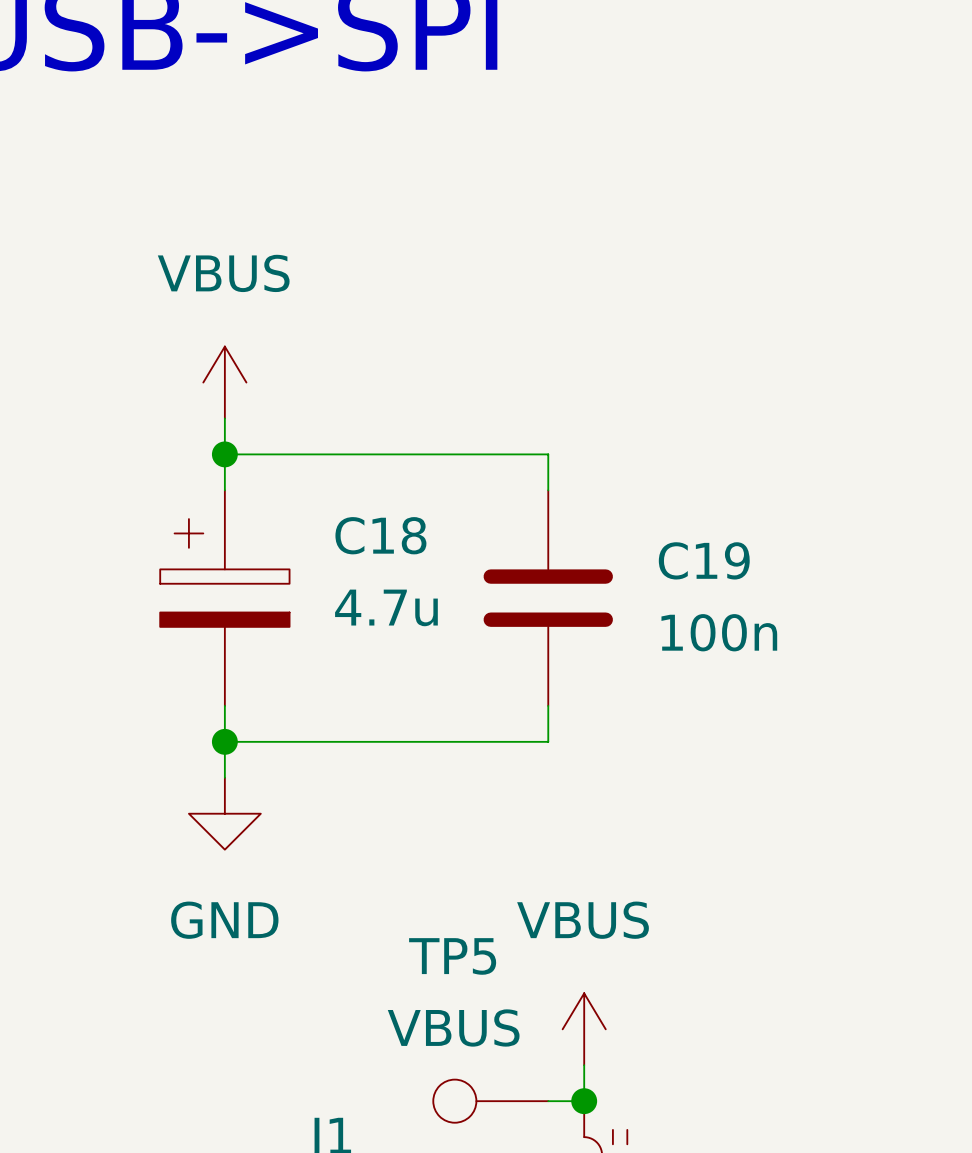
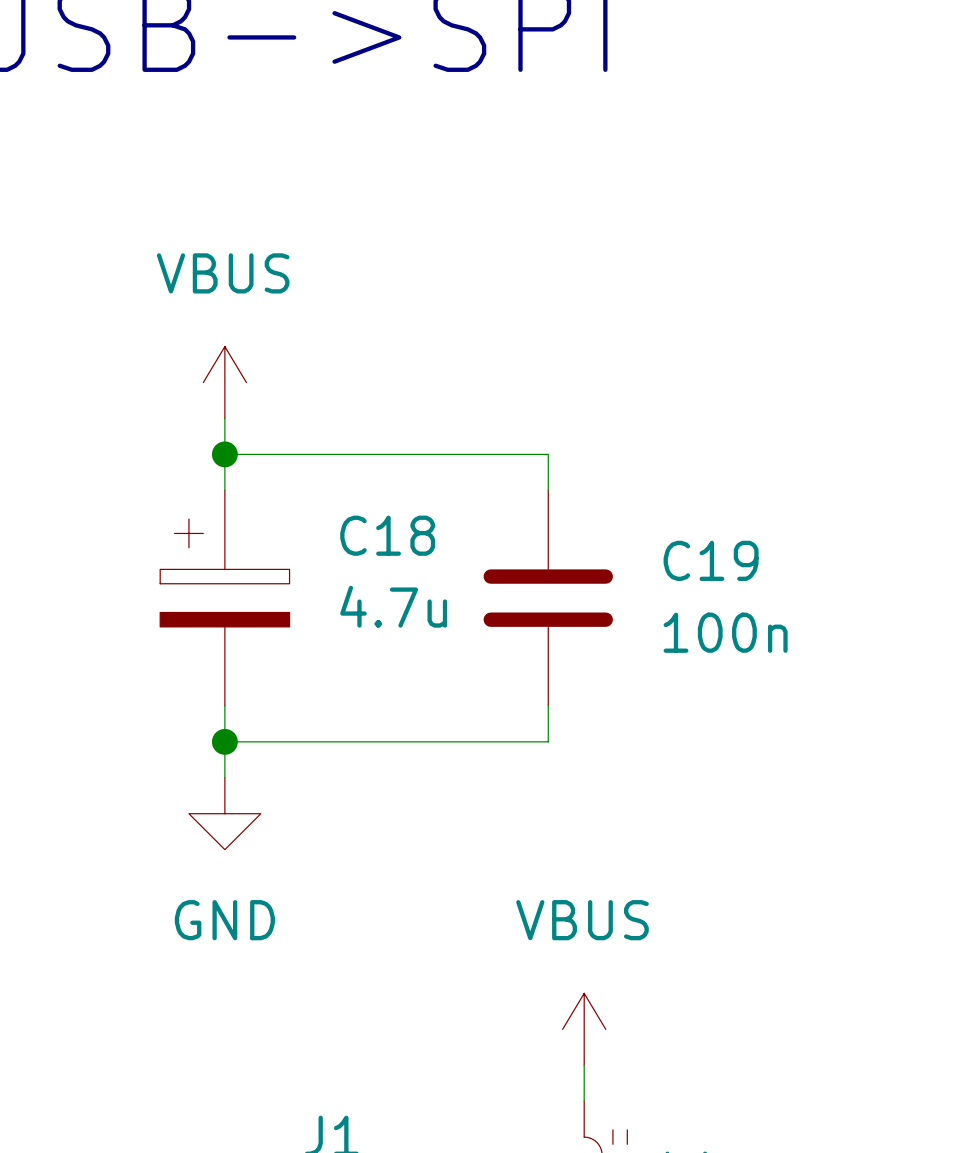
TP5: VBUS (490, 1101) -> none
wire: (548, 1101) (584, 1101) -> none
junction: (584, 1101) -> none

